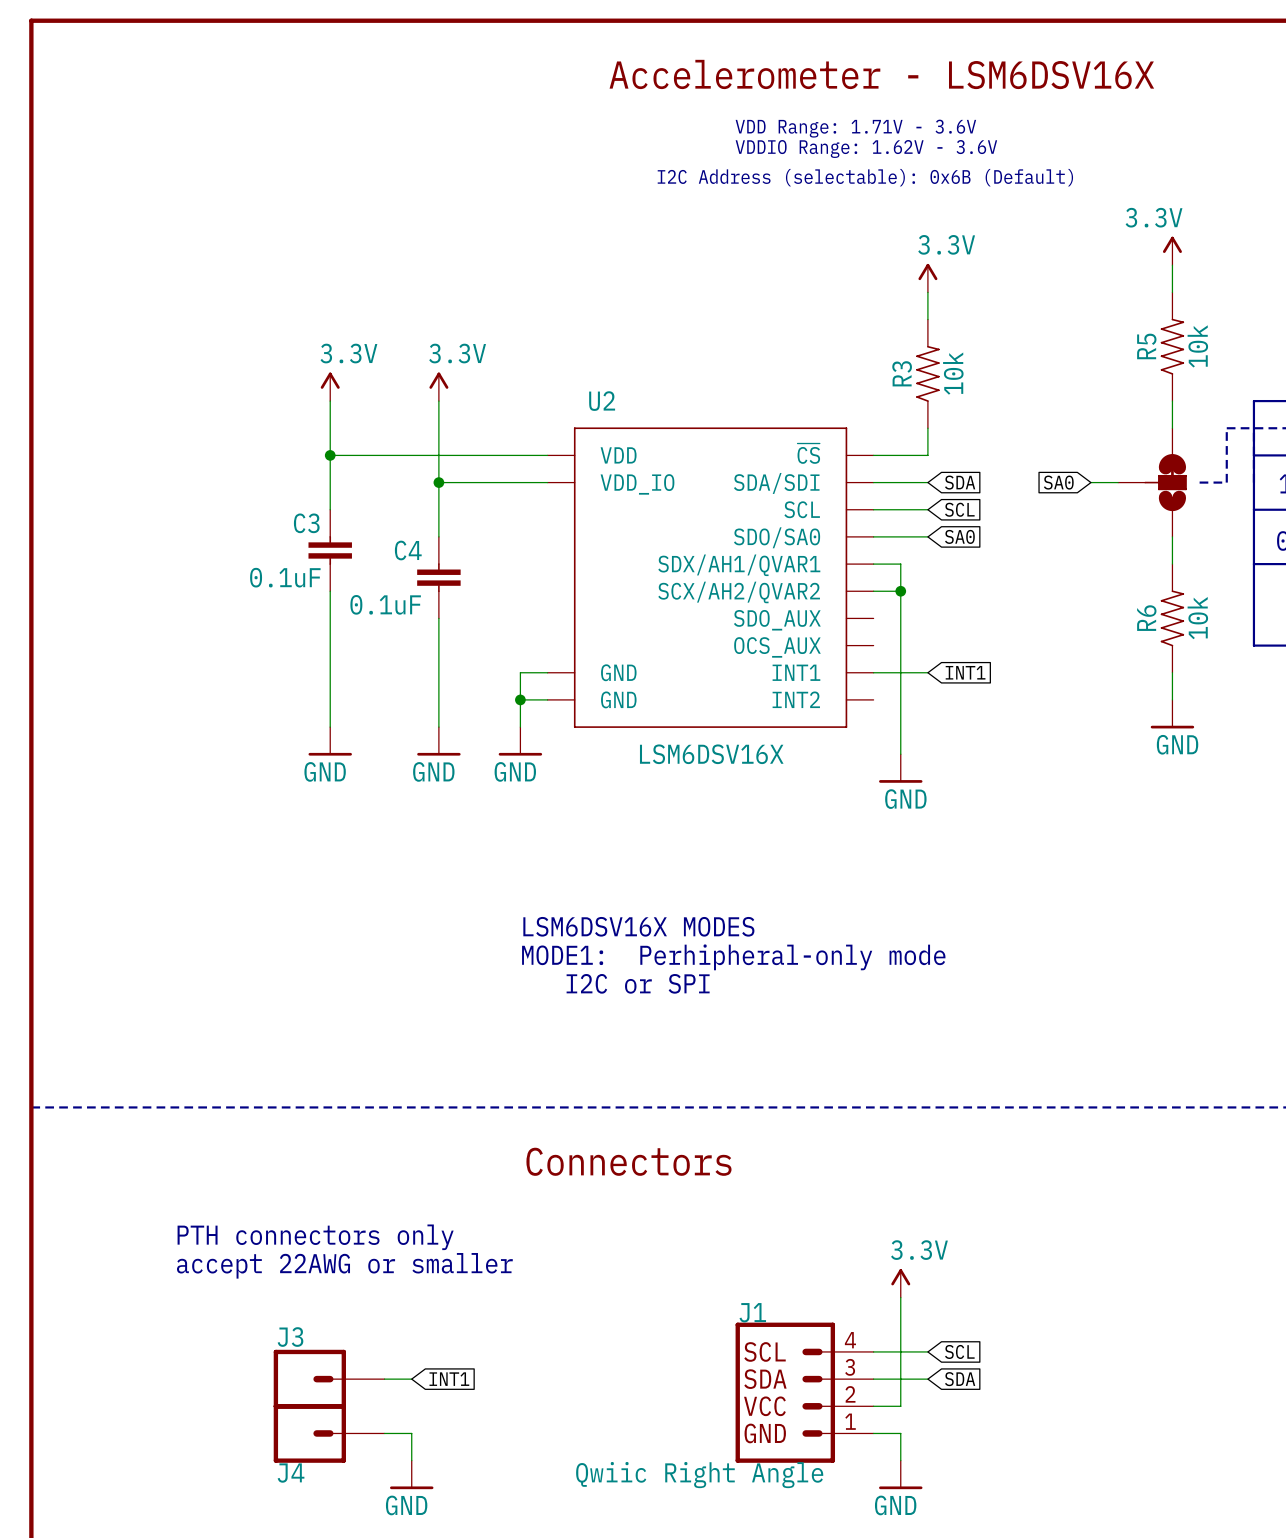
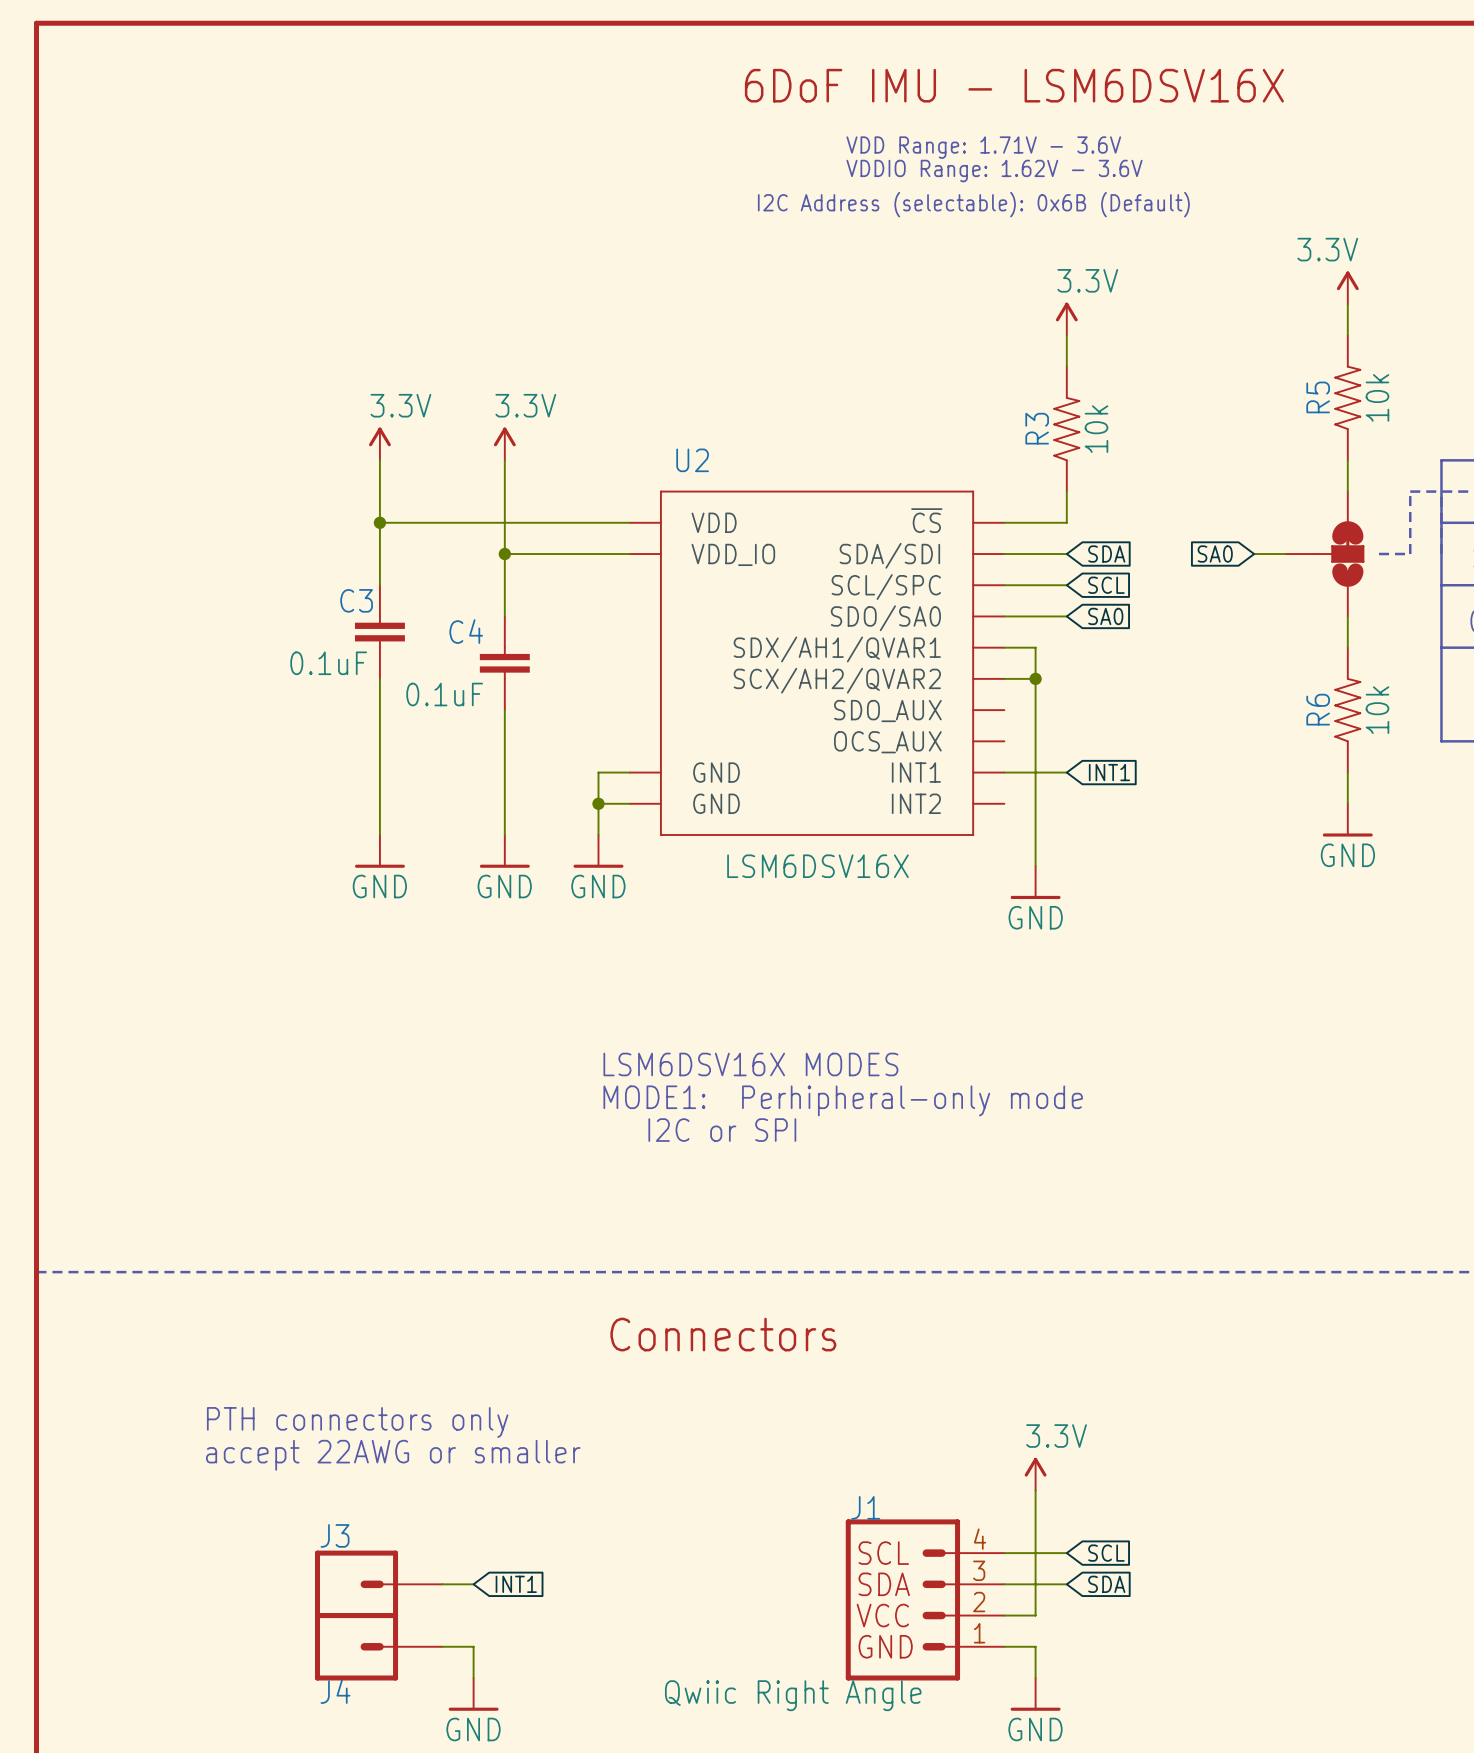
text: Accelerometer - LSM6DSV16X (881, 74) -> 6DoF IMU - LSM6DSV16X (1014, 85)
U2 pin name: SCL (802, 509) -> SCL/SPC (886, 587)

